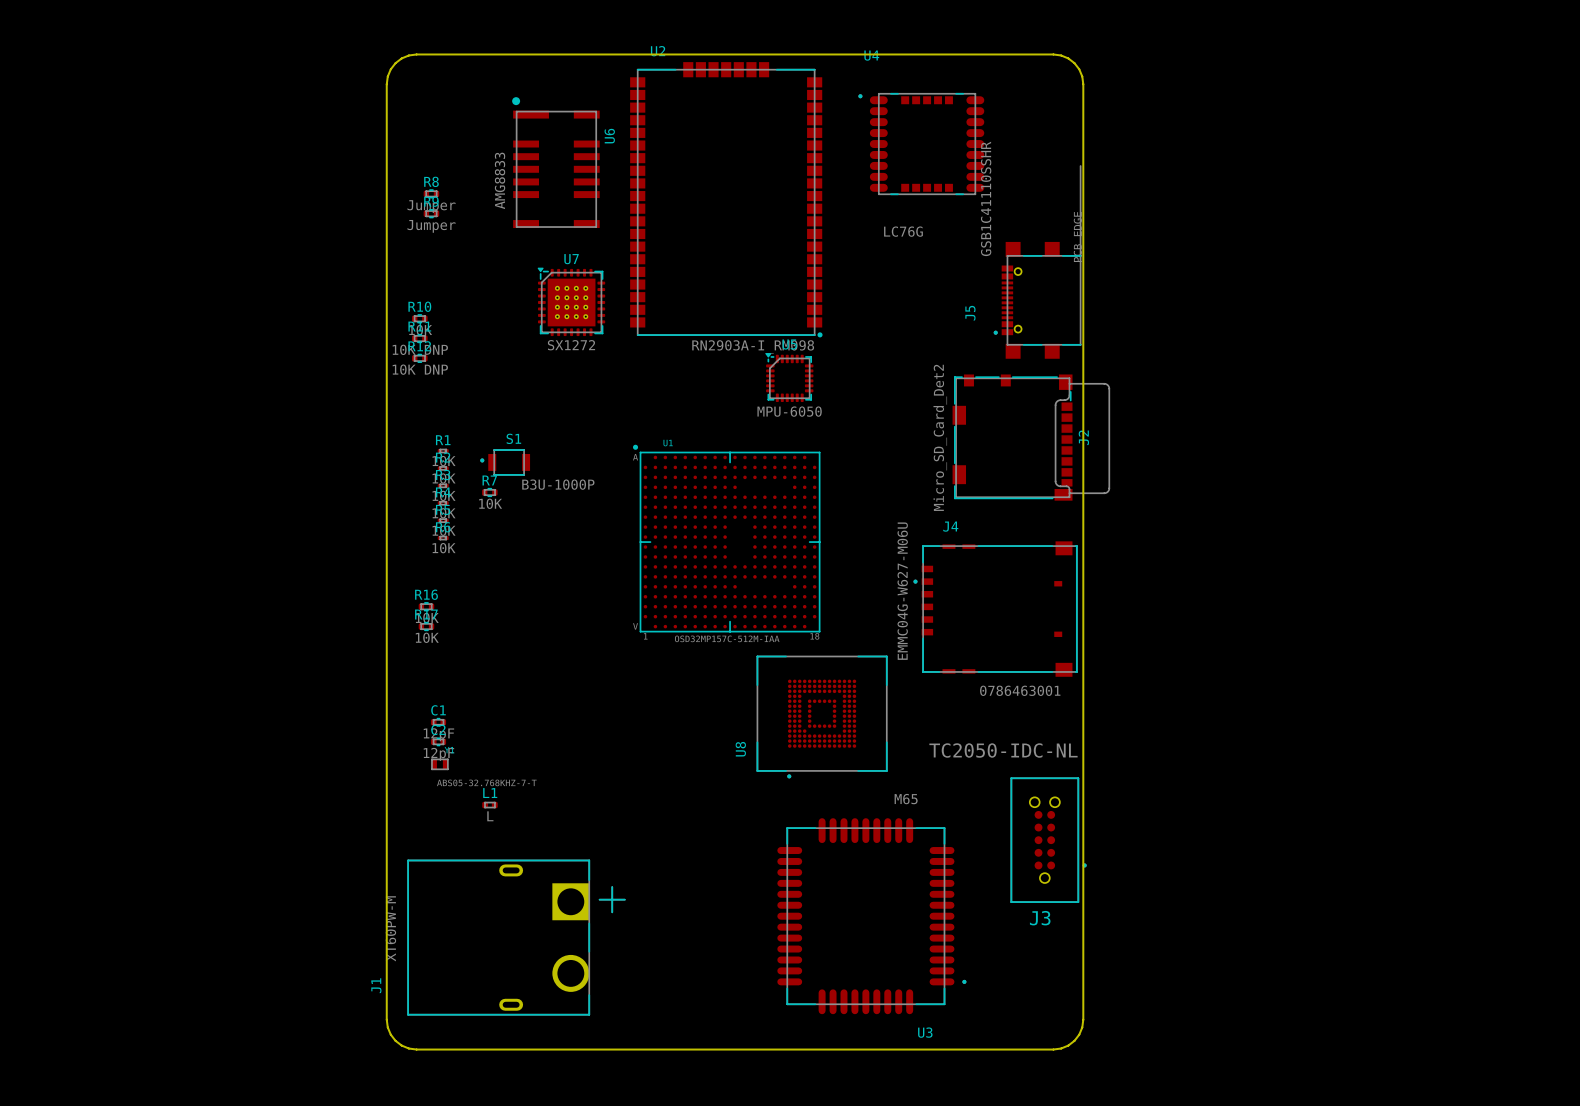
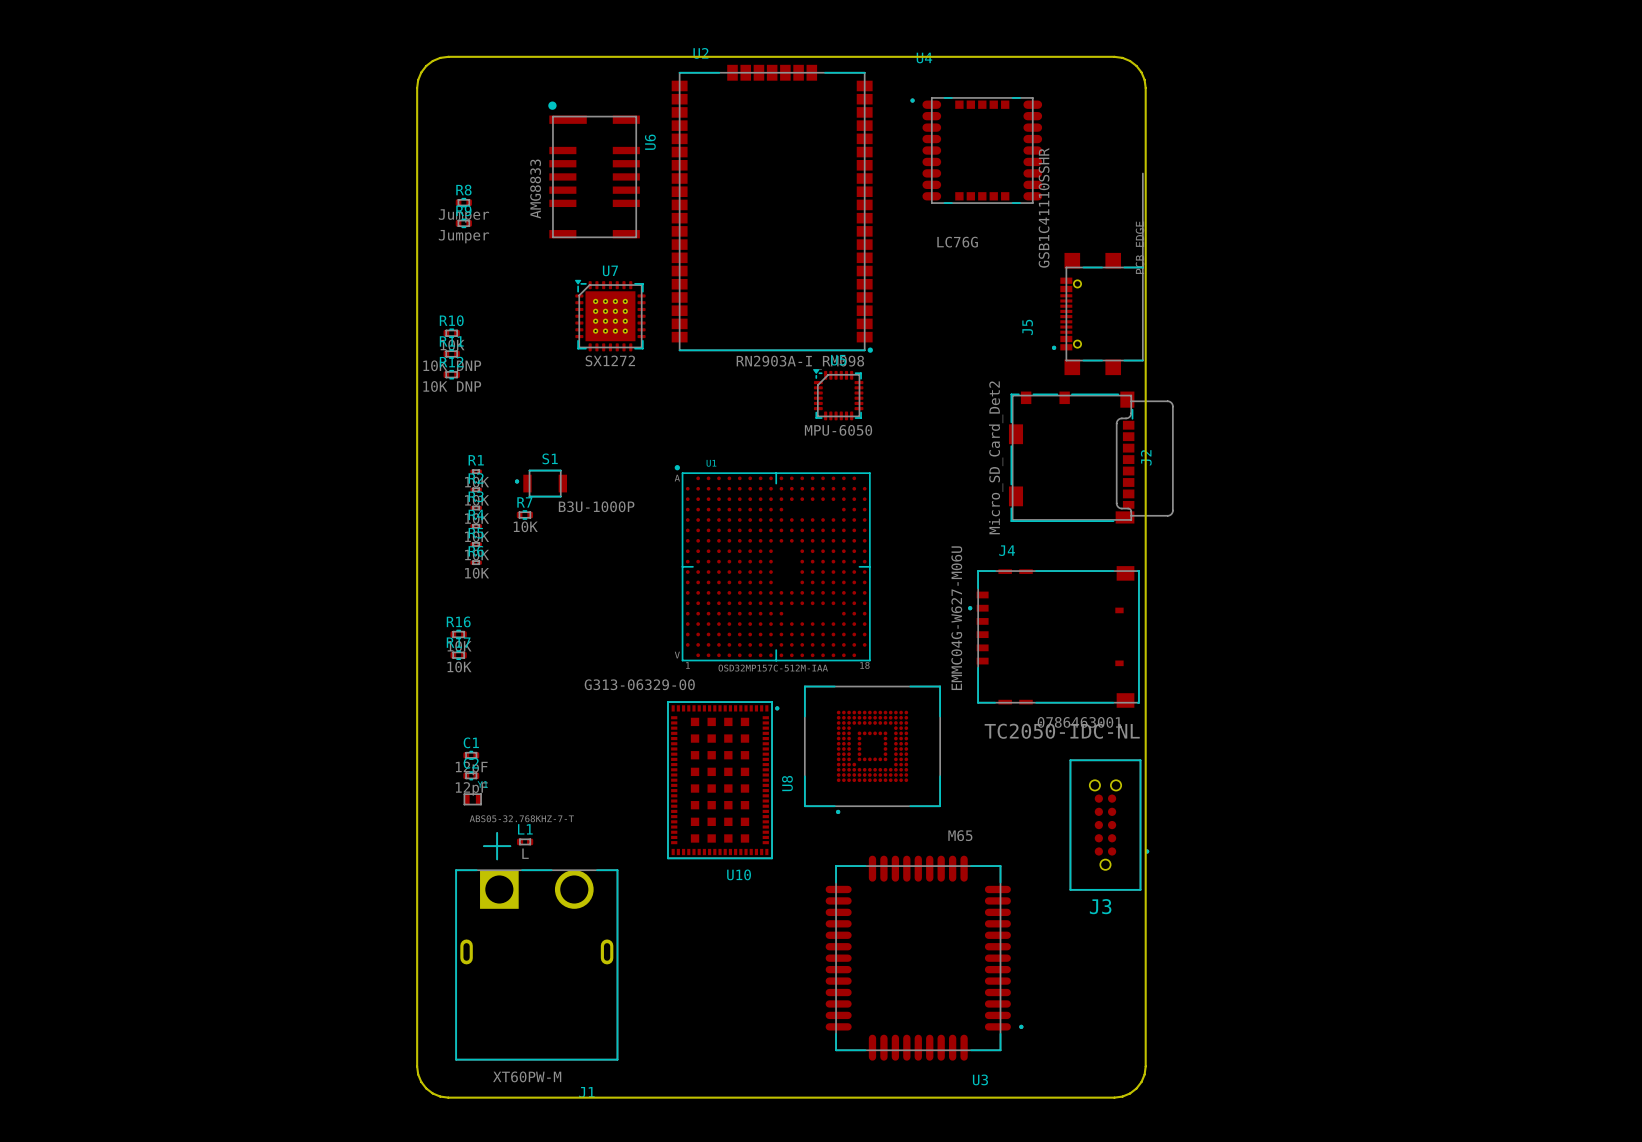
U10: none -> G313-06329-00 (723, 780)
J3 position: (1048, 840) -> (1109, 825)
J1 rotation: 0° (516, 937) -> 90° counterclockwise (536, 946)

